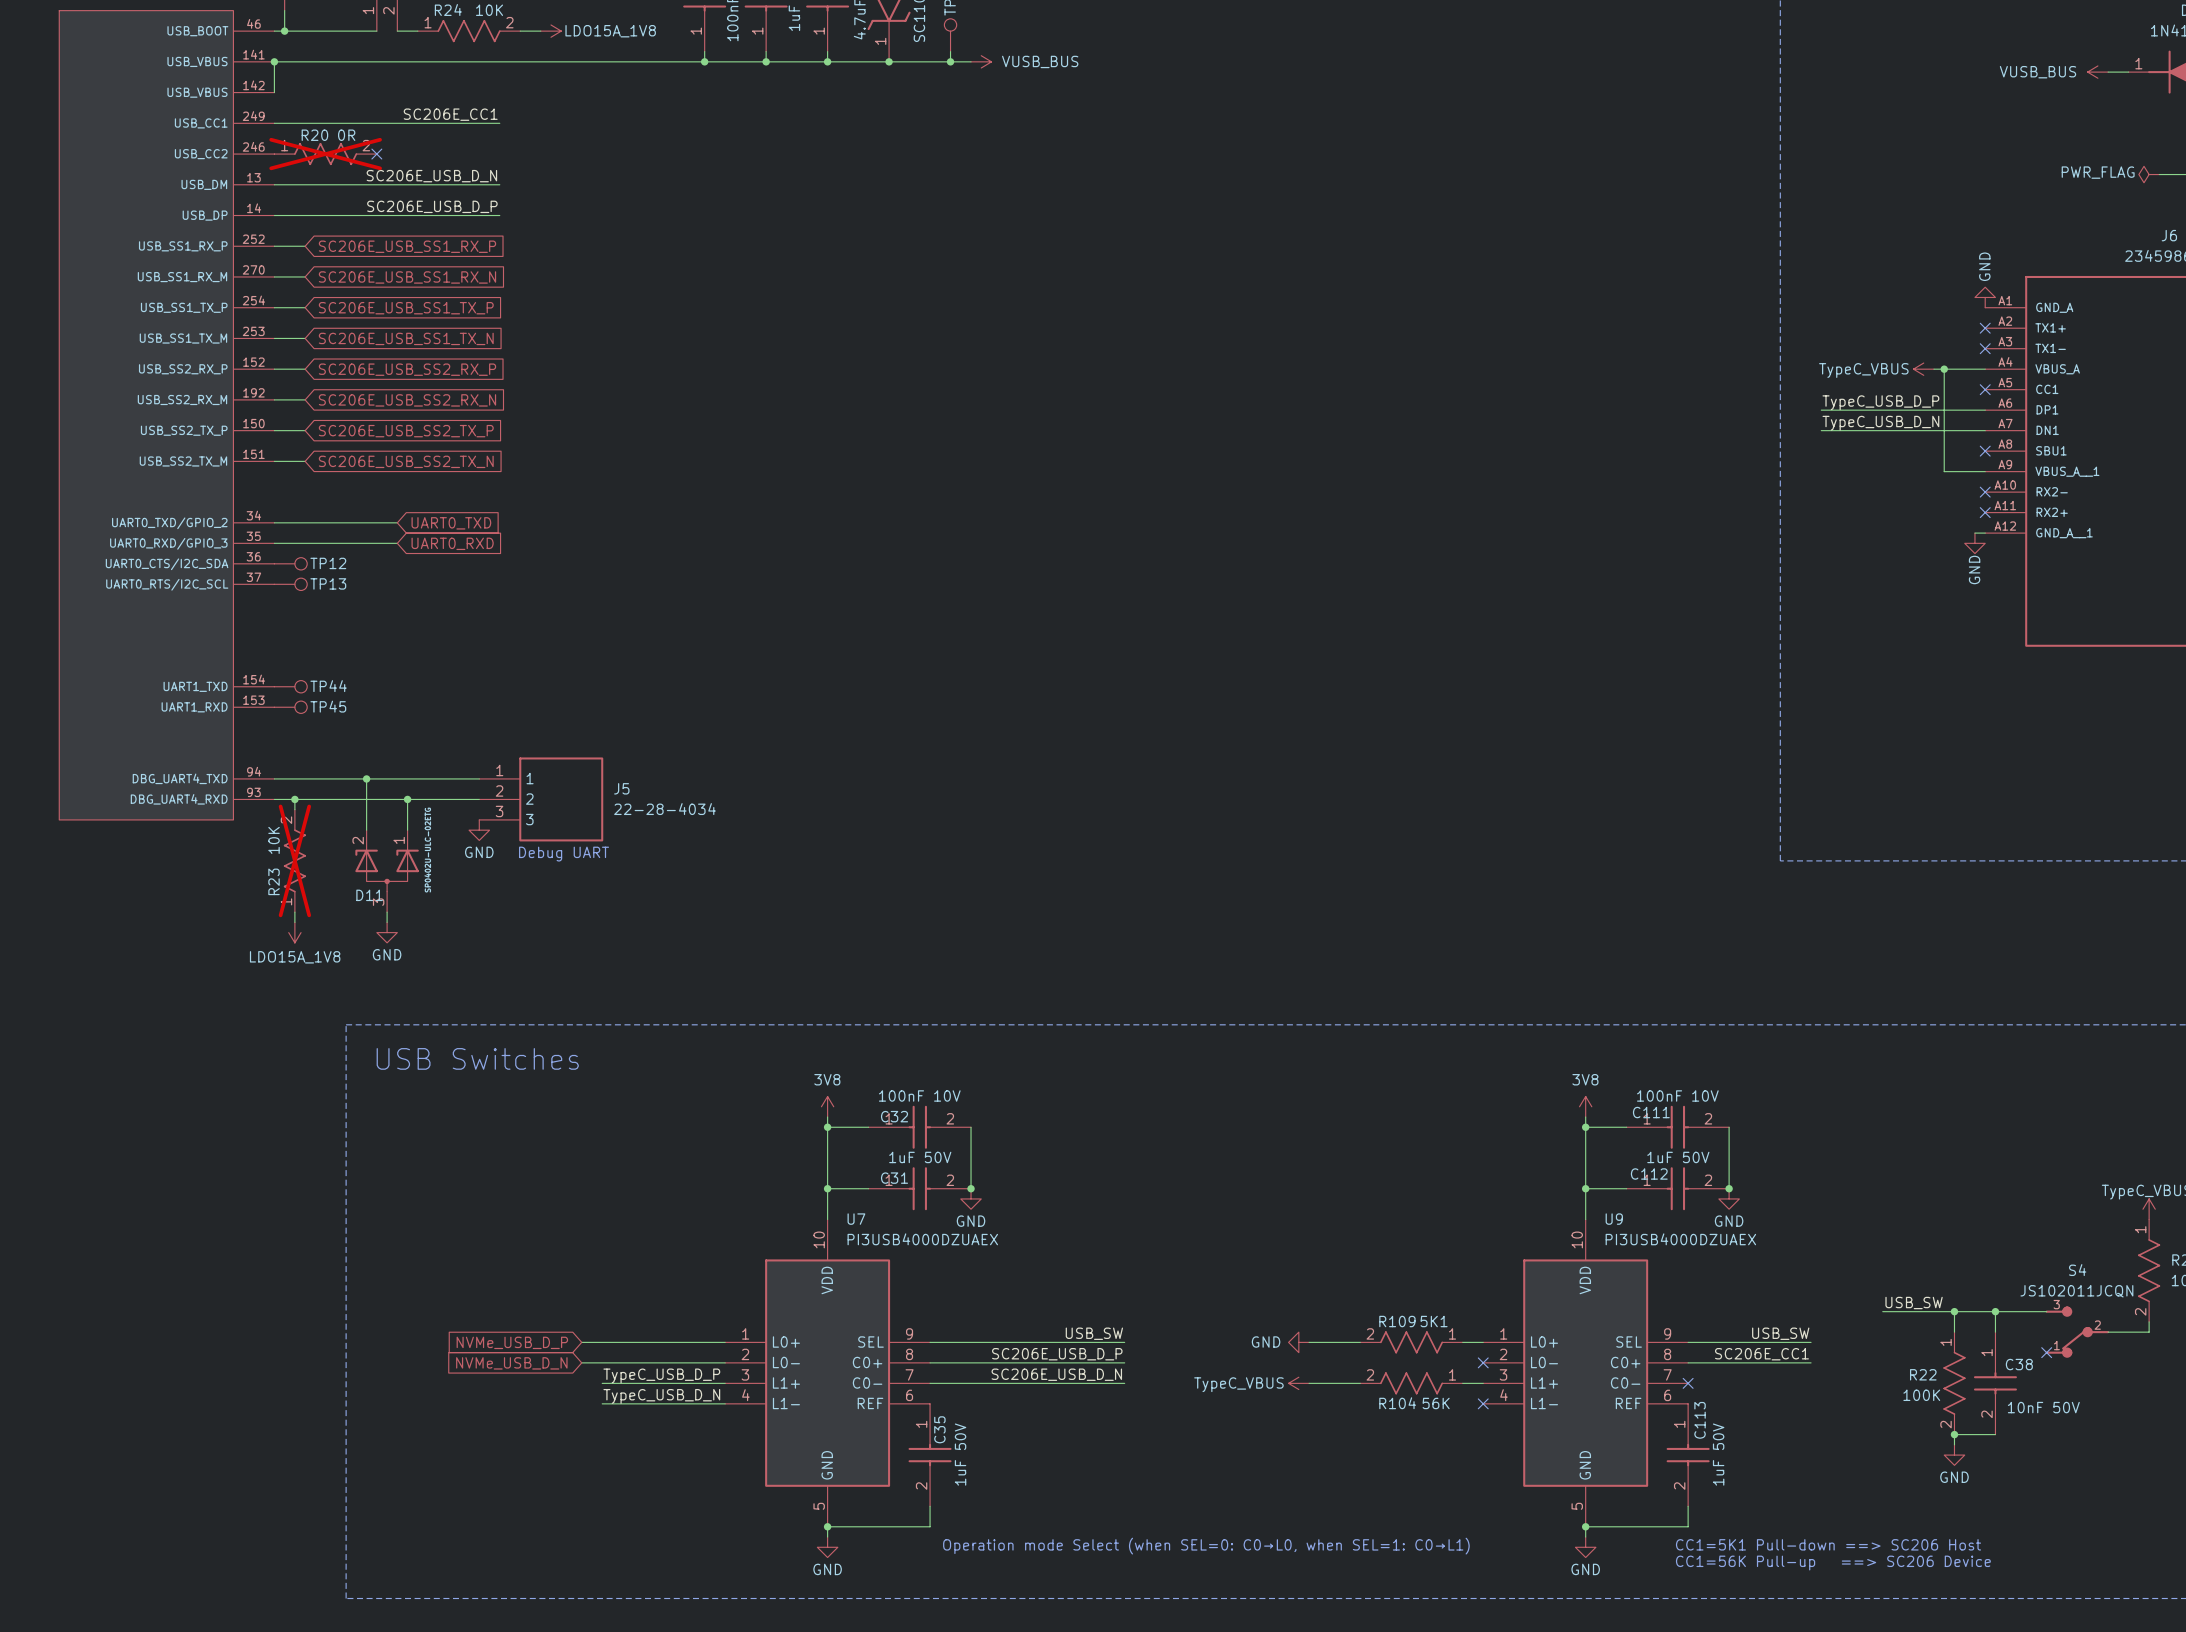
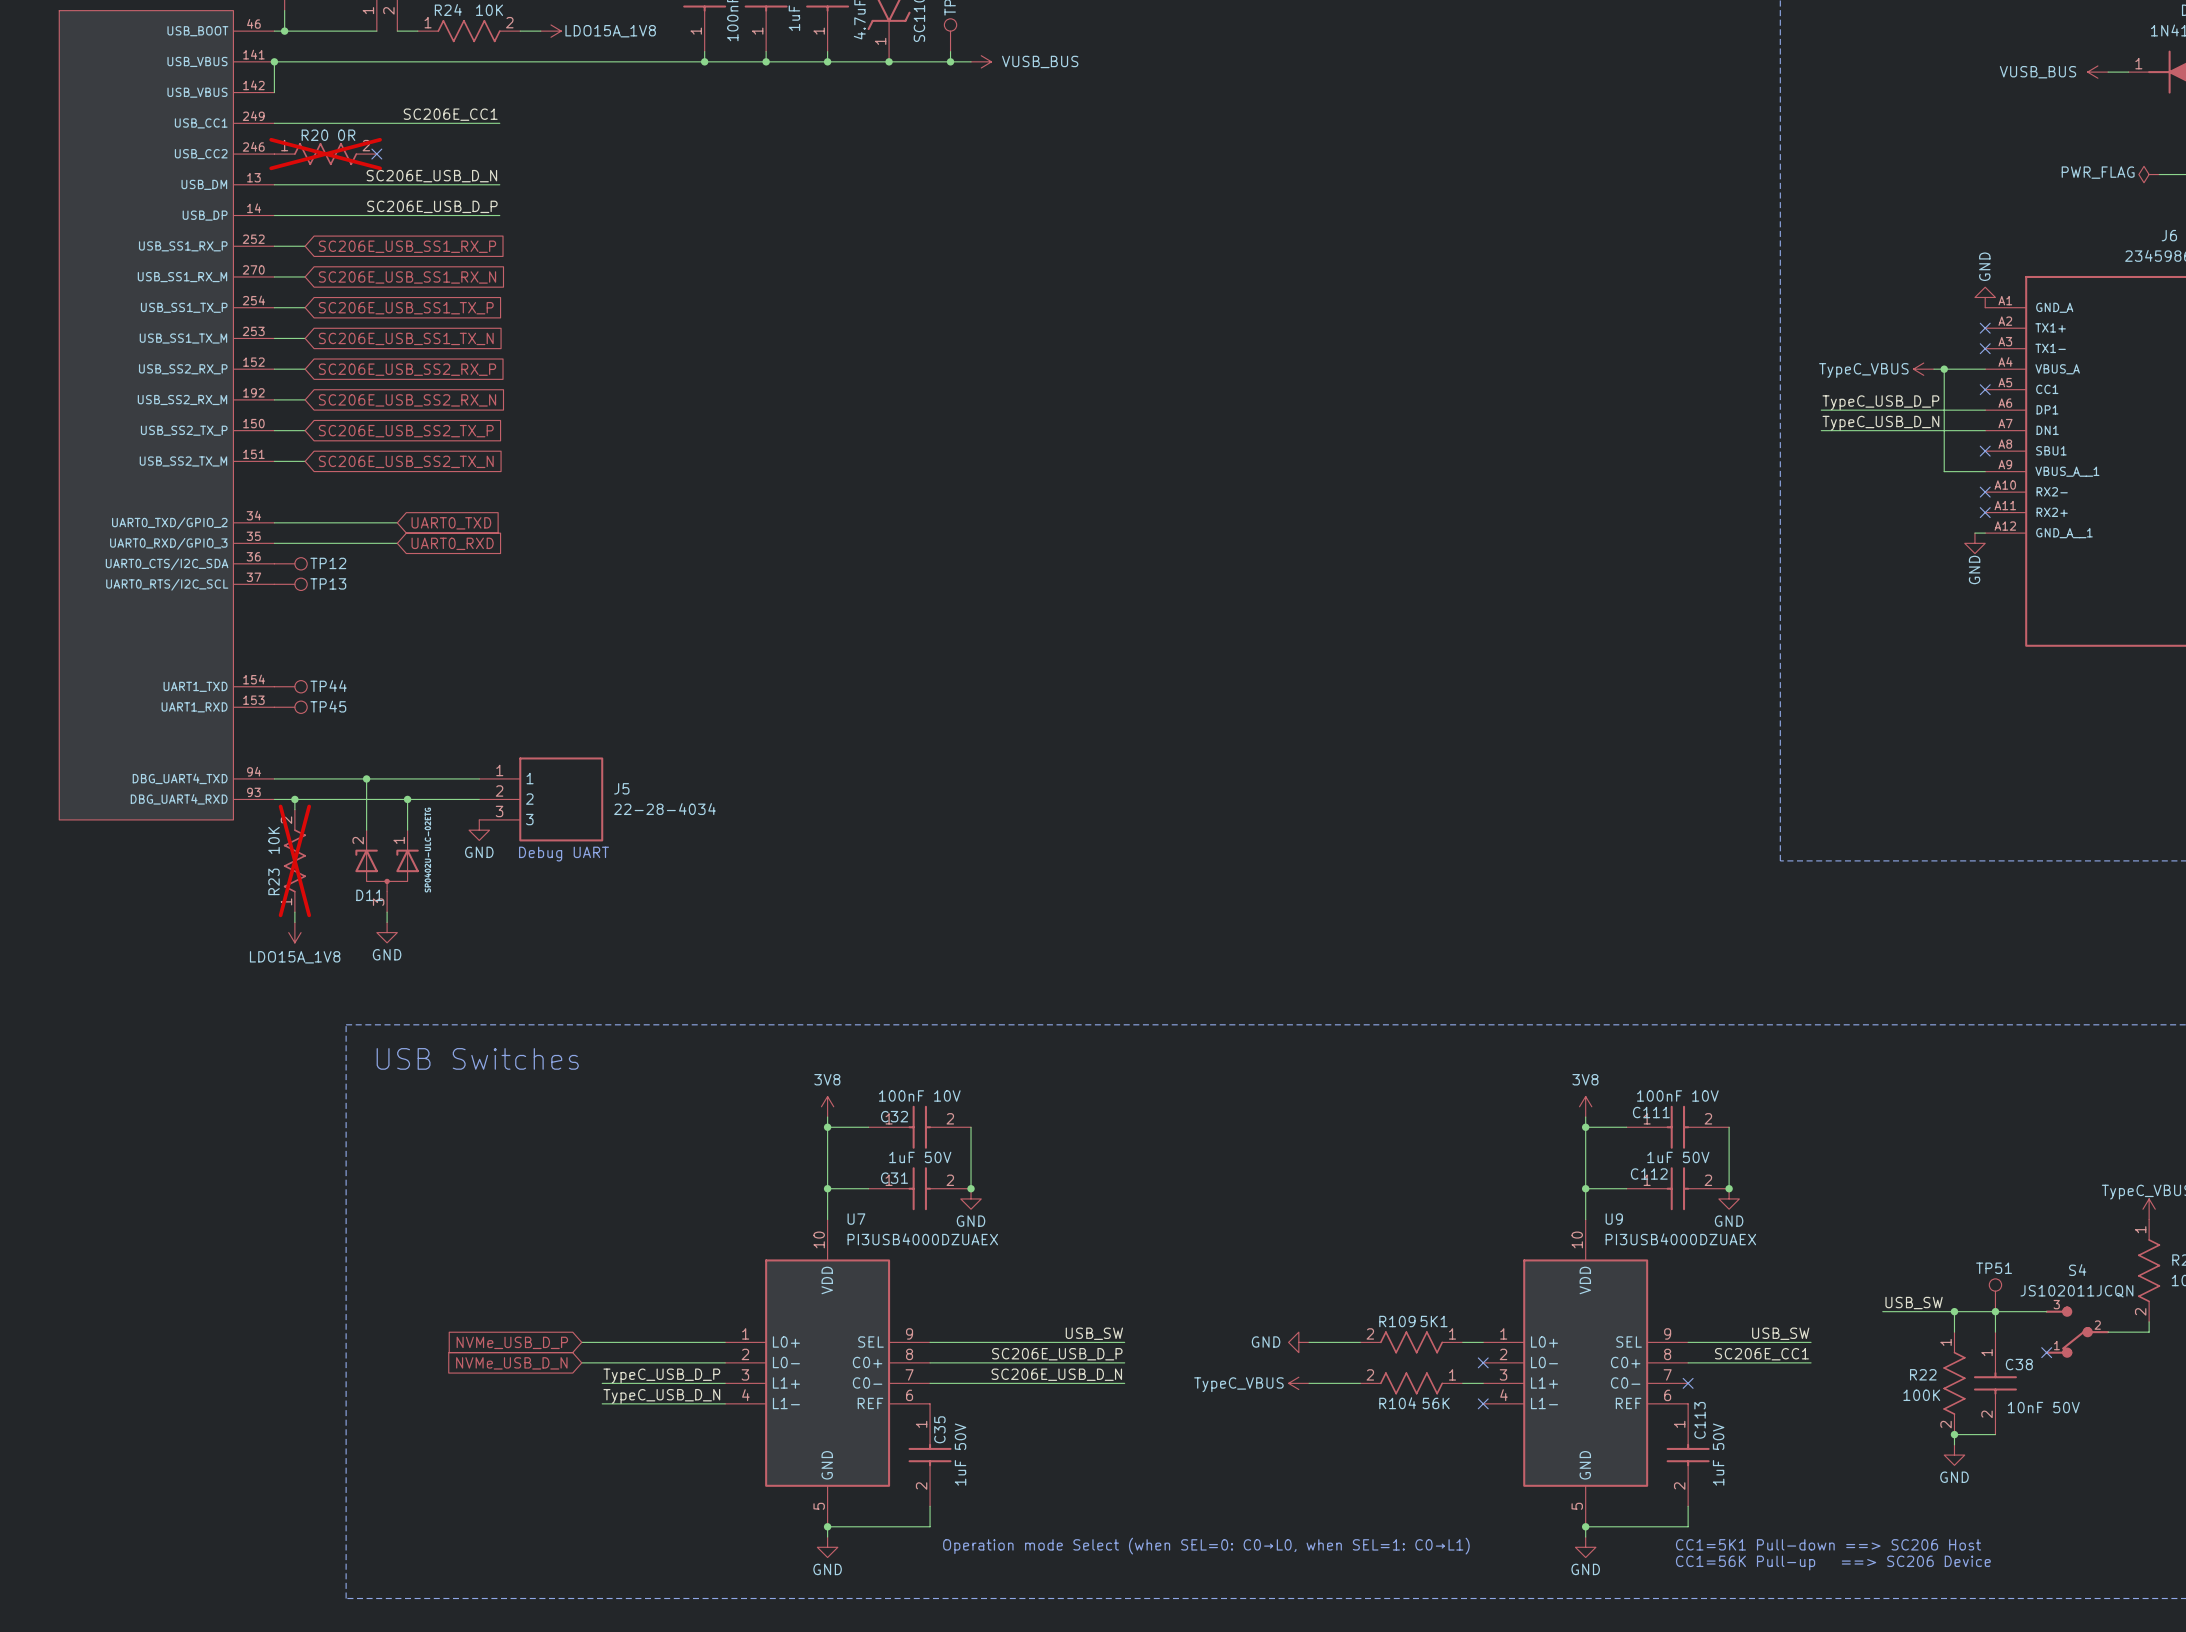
TP51: none -> (1995, 1295)

